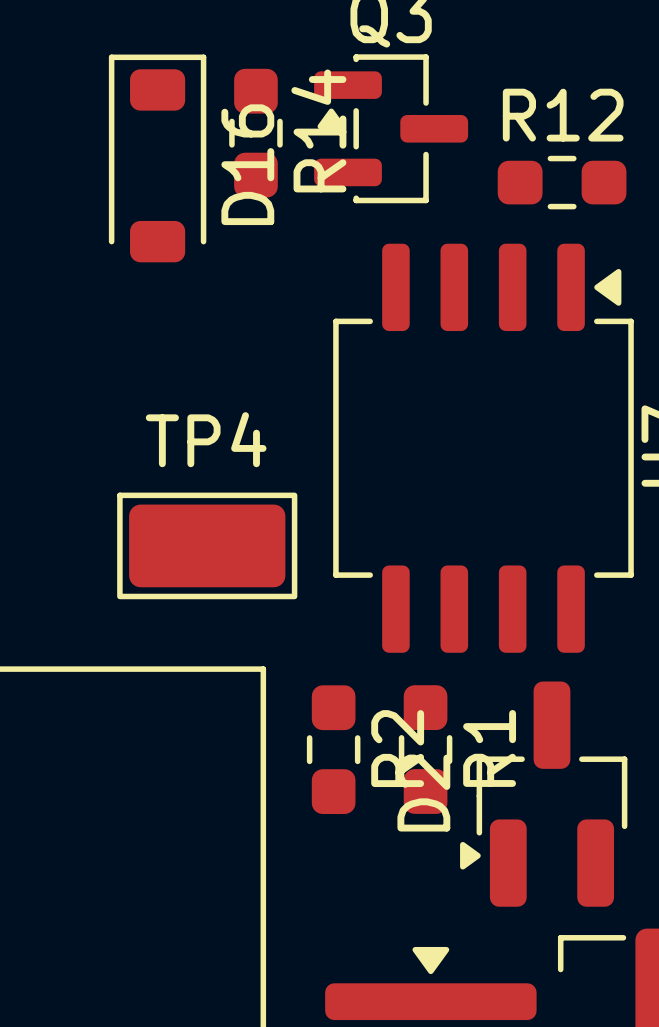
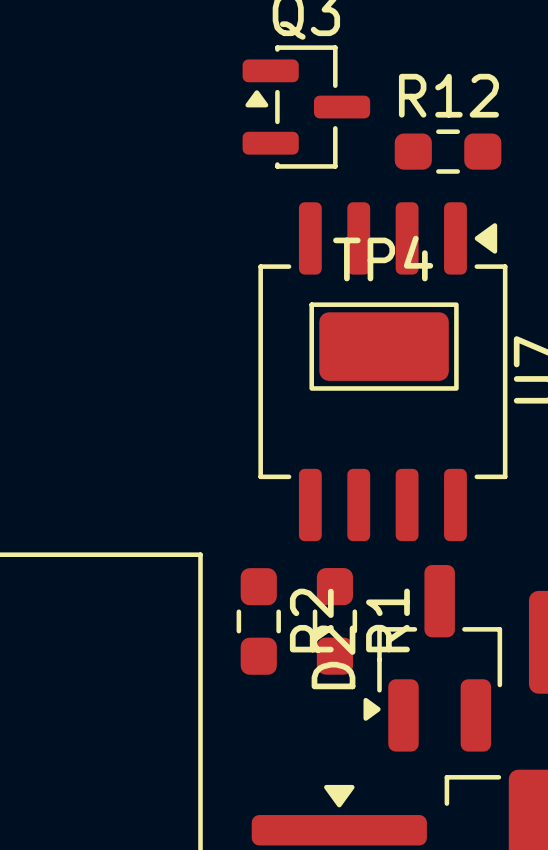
R14: (255, 133) -> none
D16: (157, 158) -> none
TP4 position: (207, 545) -> (384, 346)

